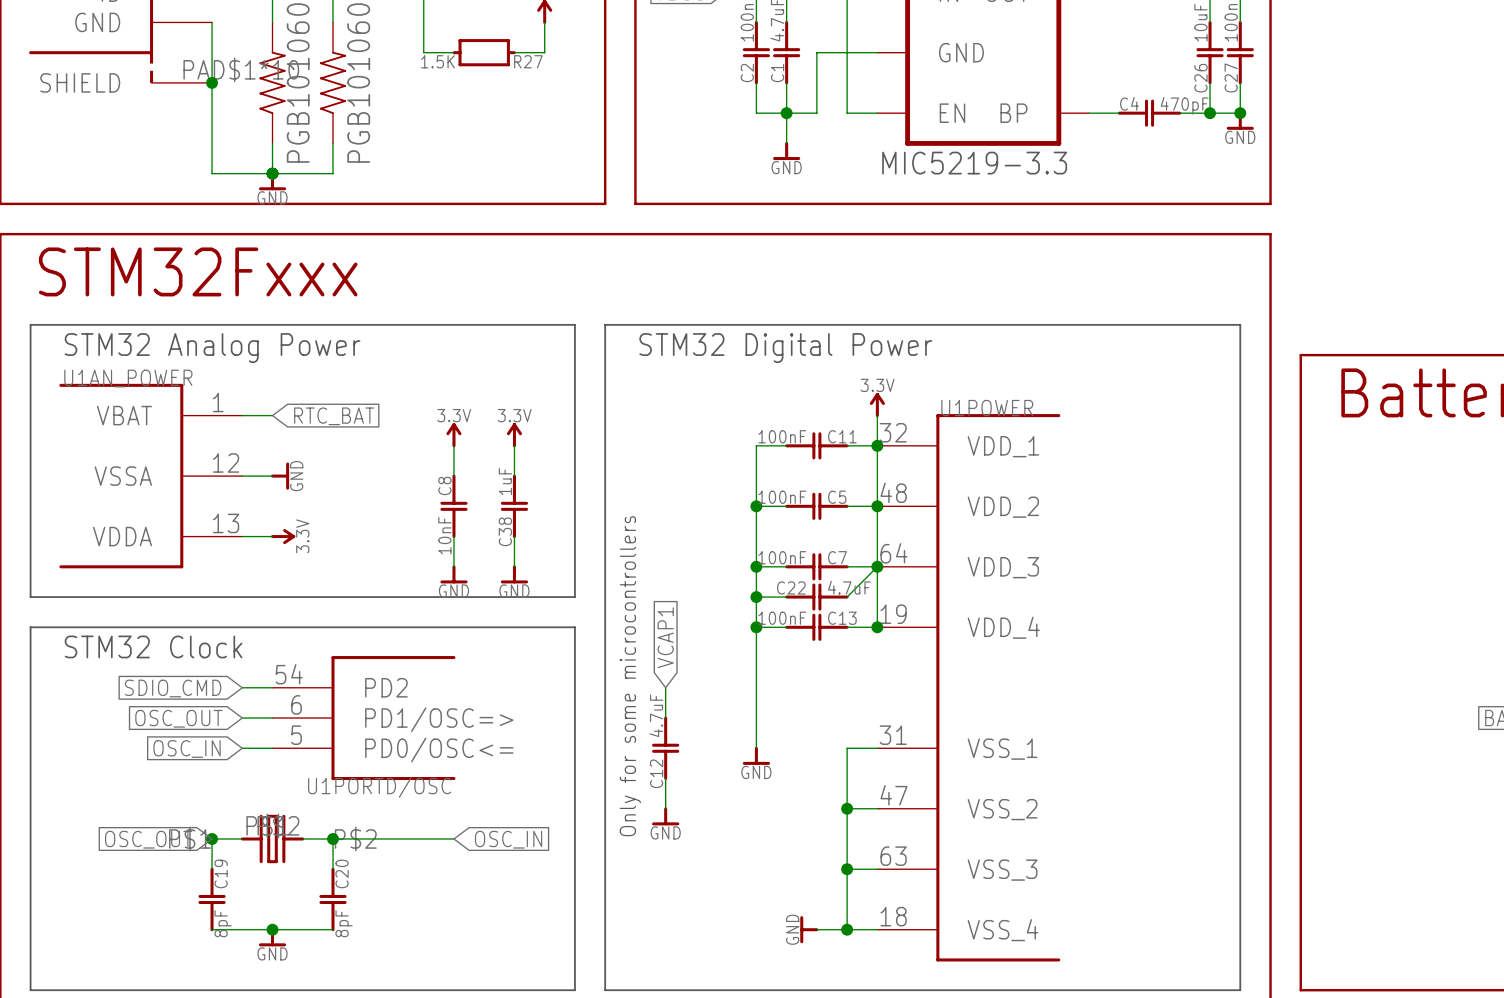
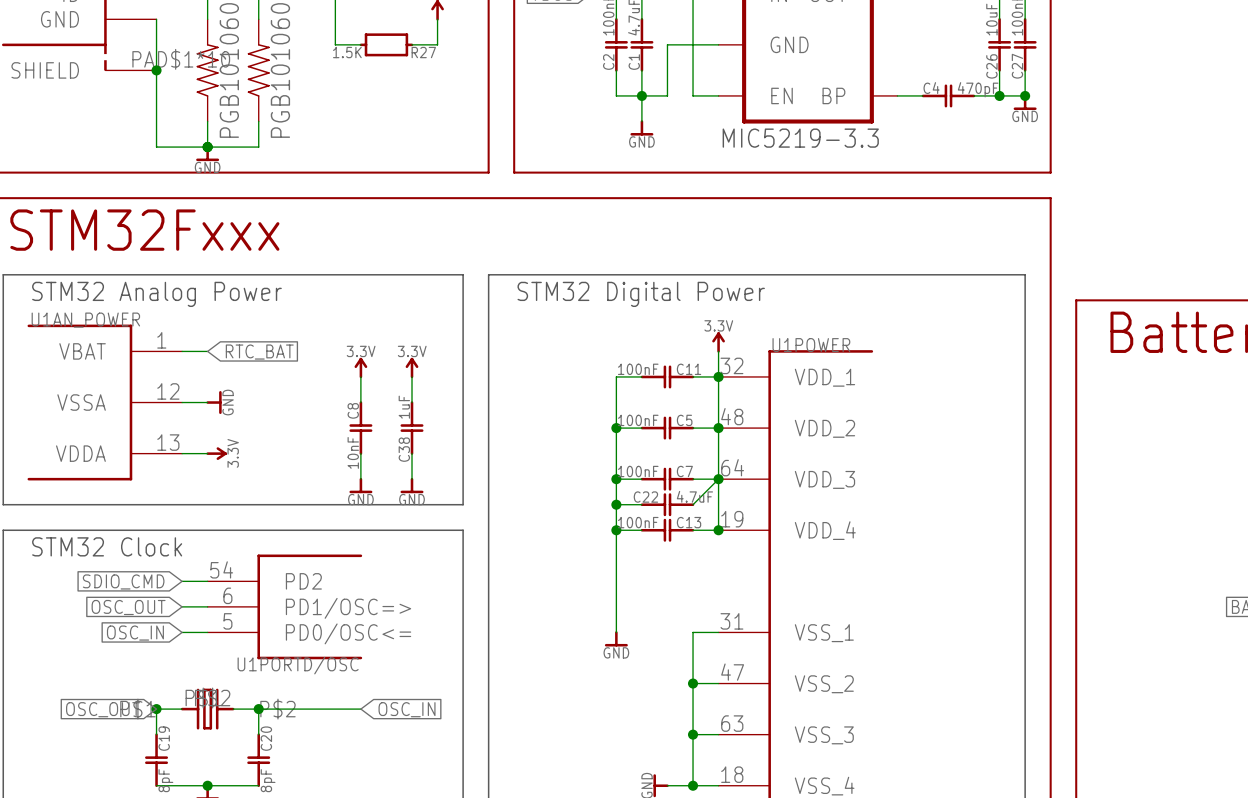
global label: VCAP1 (665, 637) -> none
text: Only for some microcontrollers (630, 676) -> none
wire: (665, 687) (665, 718) -> none
C12: 4.7uF (665, 748) -> none
wire: (665, 778) (665, 808) -> none
power symbol: GND (665, 816) -> none

